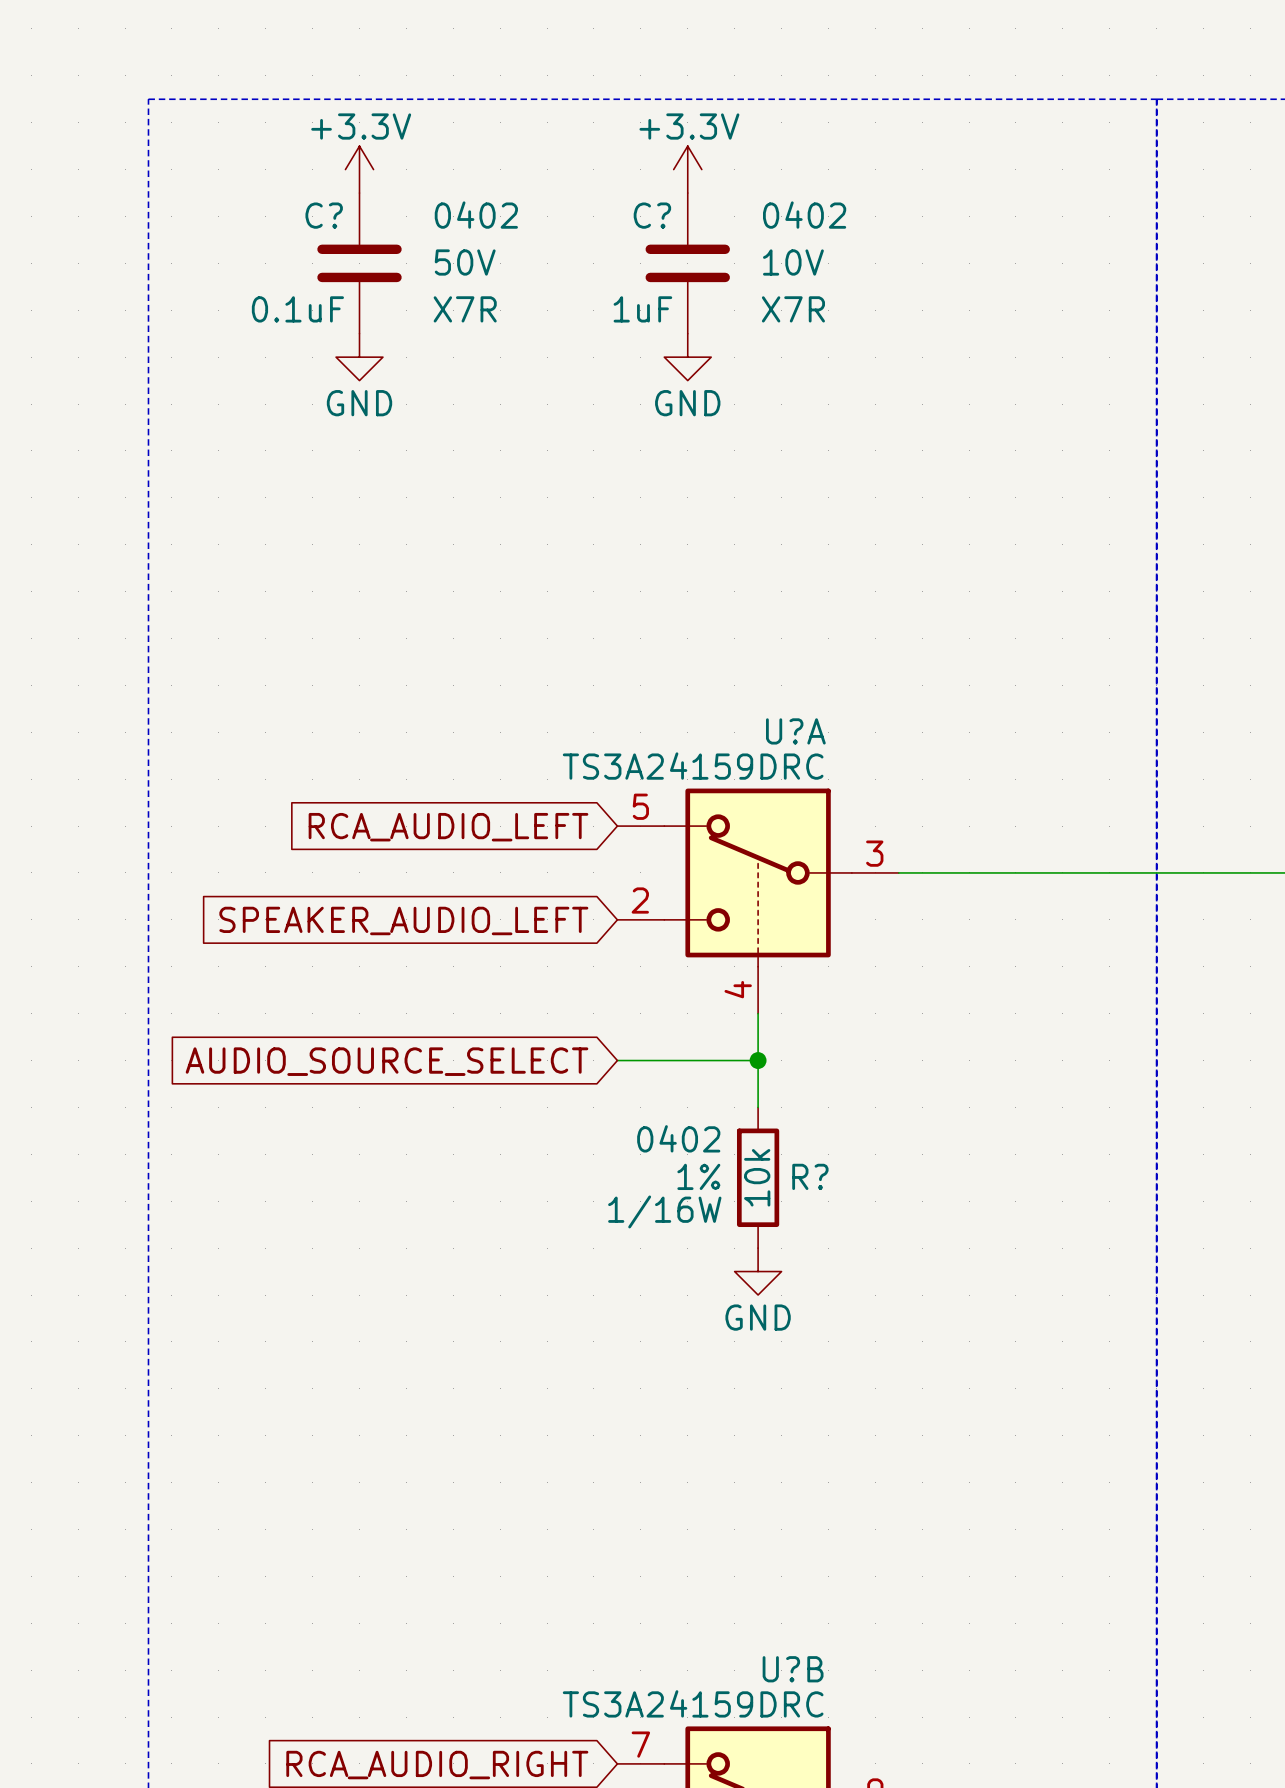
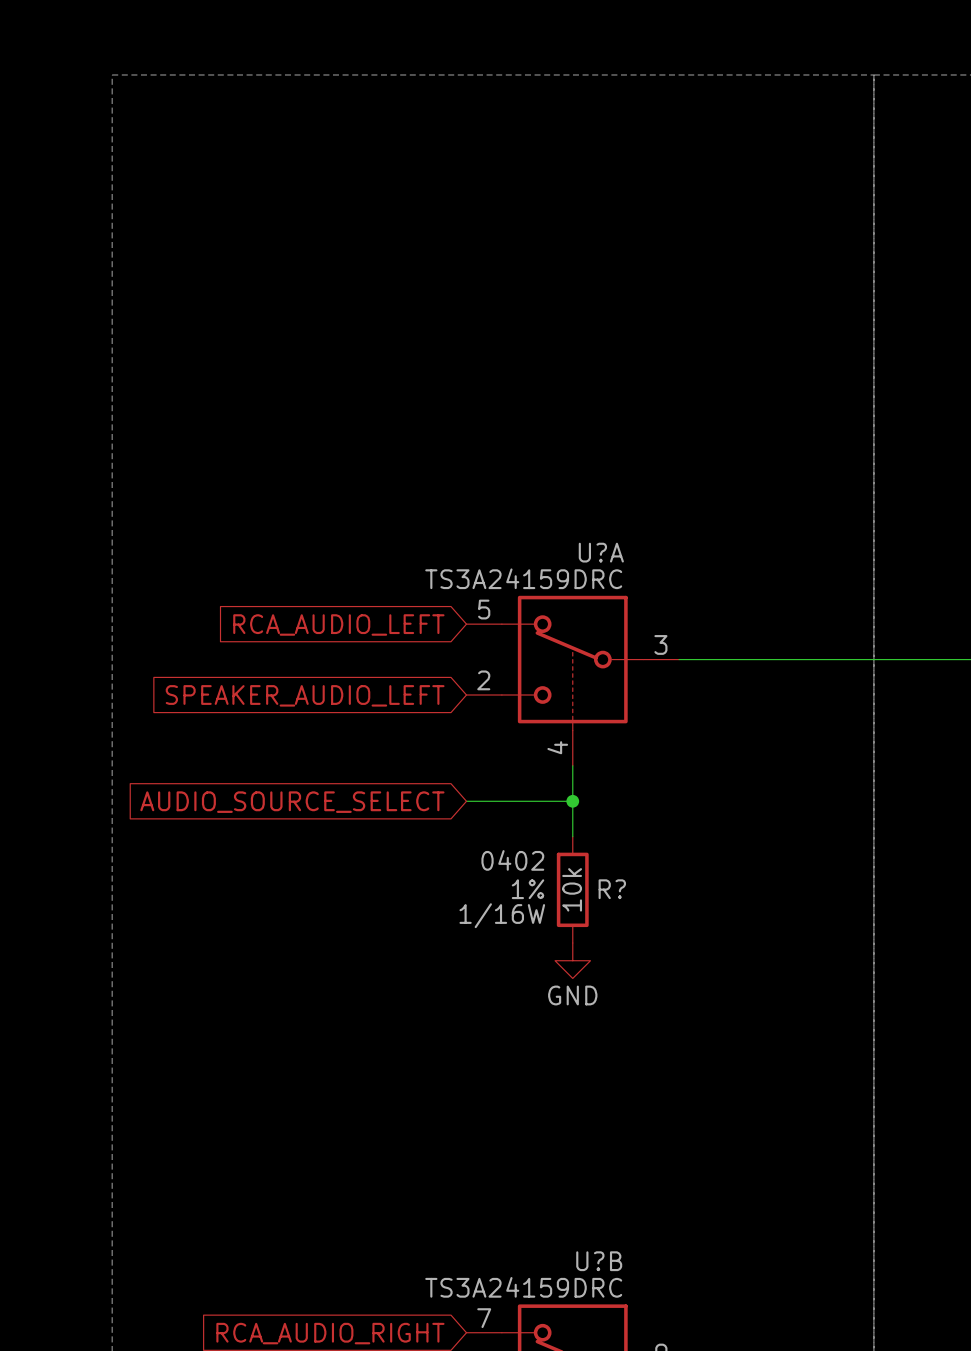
power symbol: +3.3V (359, 169) -> none
power symbol: +3.3V (687, 169) -> none
C?: 0.1uF (359, 263) -> none
C?: 1uF (687, 263) -> none
power symbol: GND (359, 357) -> none
power symbol: GND (687, 357) -> none

